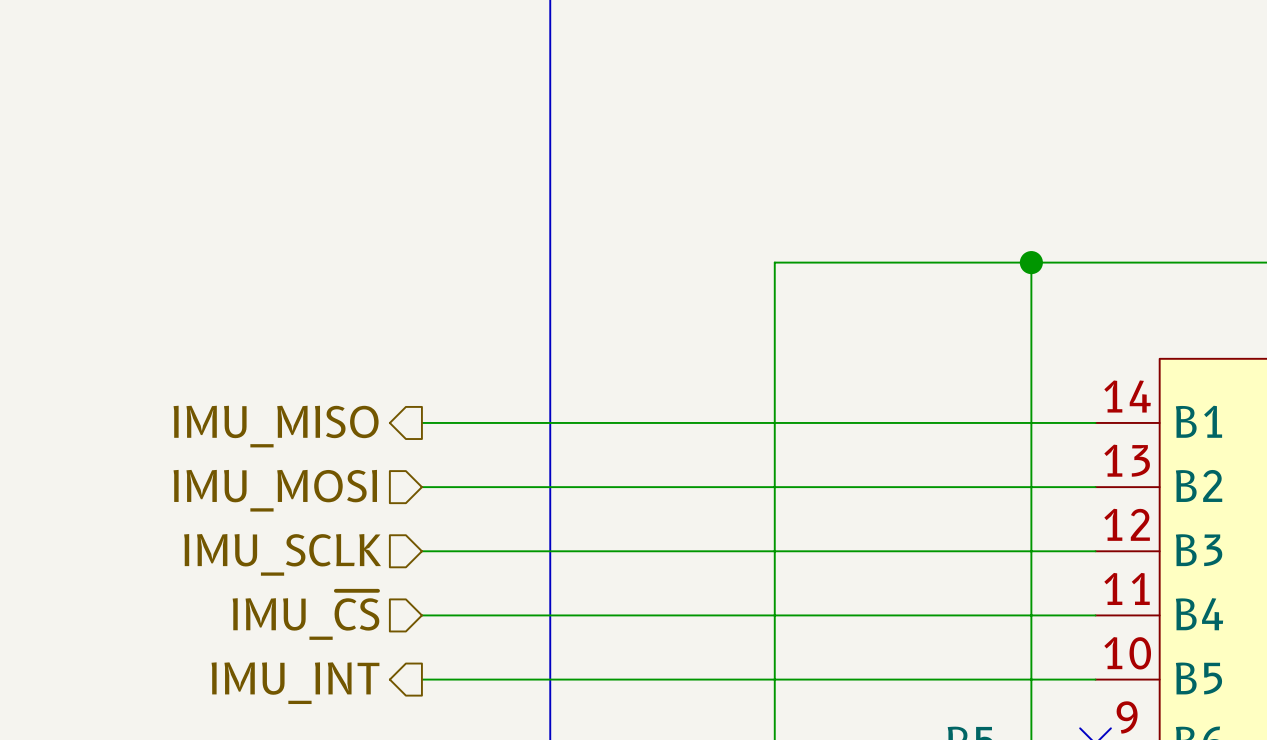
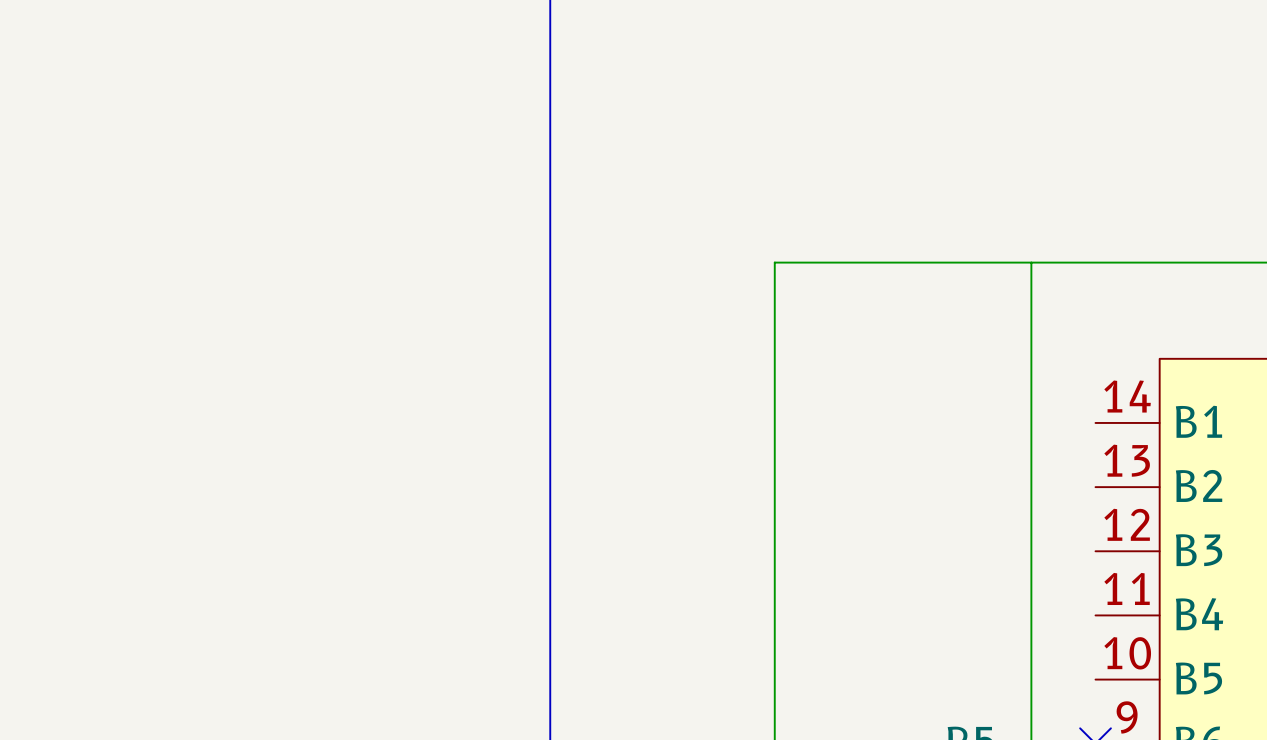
junction: (1031, 262) -> none
wire: (421, 422) (1095, 422) -> none
hierarchical label: IMU_MISO (276, 426) -> none
wire: (421, 487) (1095, 487) -> none
hierarchical label: IMU_MOSI (275, 490) -> none
wire: (421, 551) (1095, 551) -> none
hierarchical label: IMU_SCLK (282, 554) -> none
hierarchical label: IMU_~{CS} (305, 615) -> none
wire: (421, 615) (1095, 615) -> none
wire: (421, 679) (1095, 679) -> none
hierarchical label: IMU_INT (295, 683) -> none

